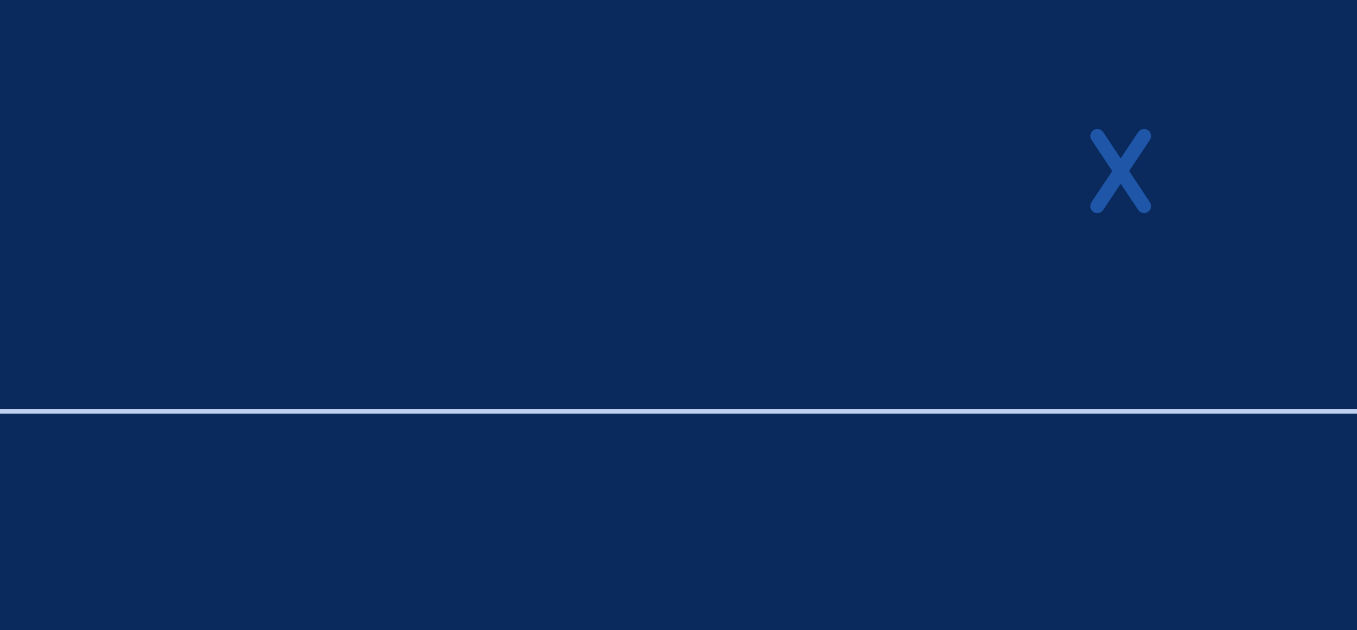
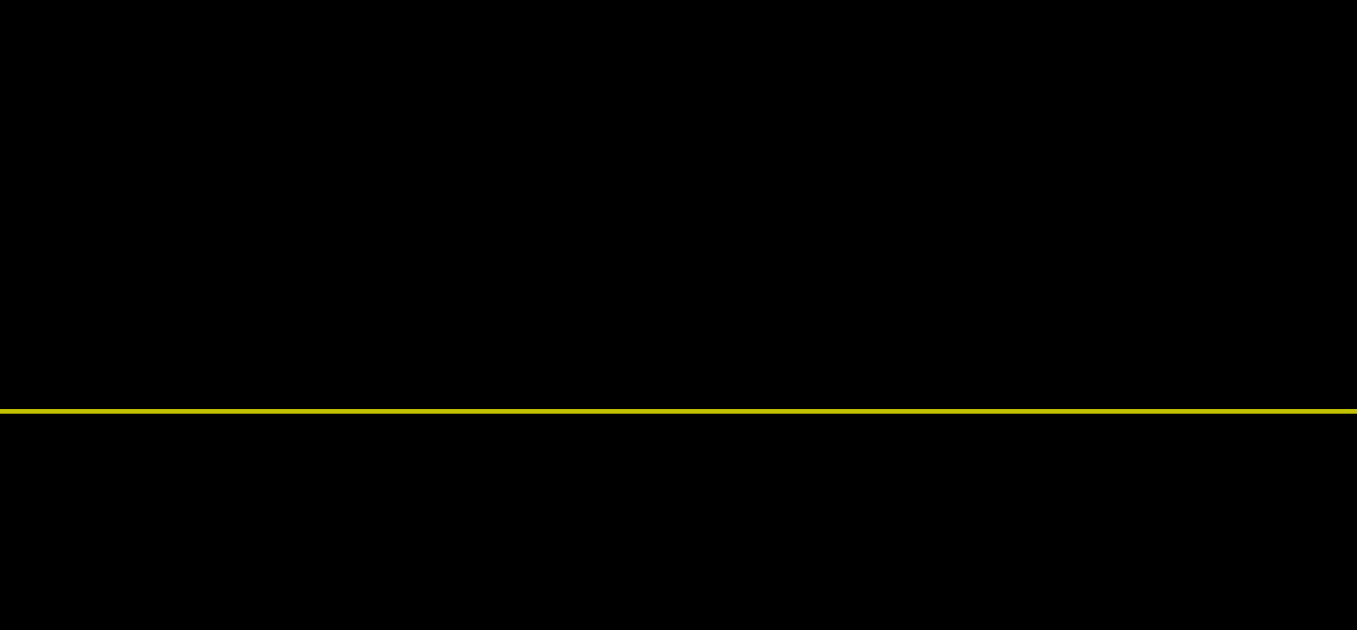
text: X (1120, 171) -> none

